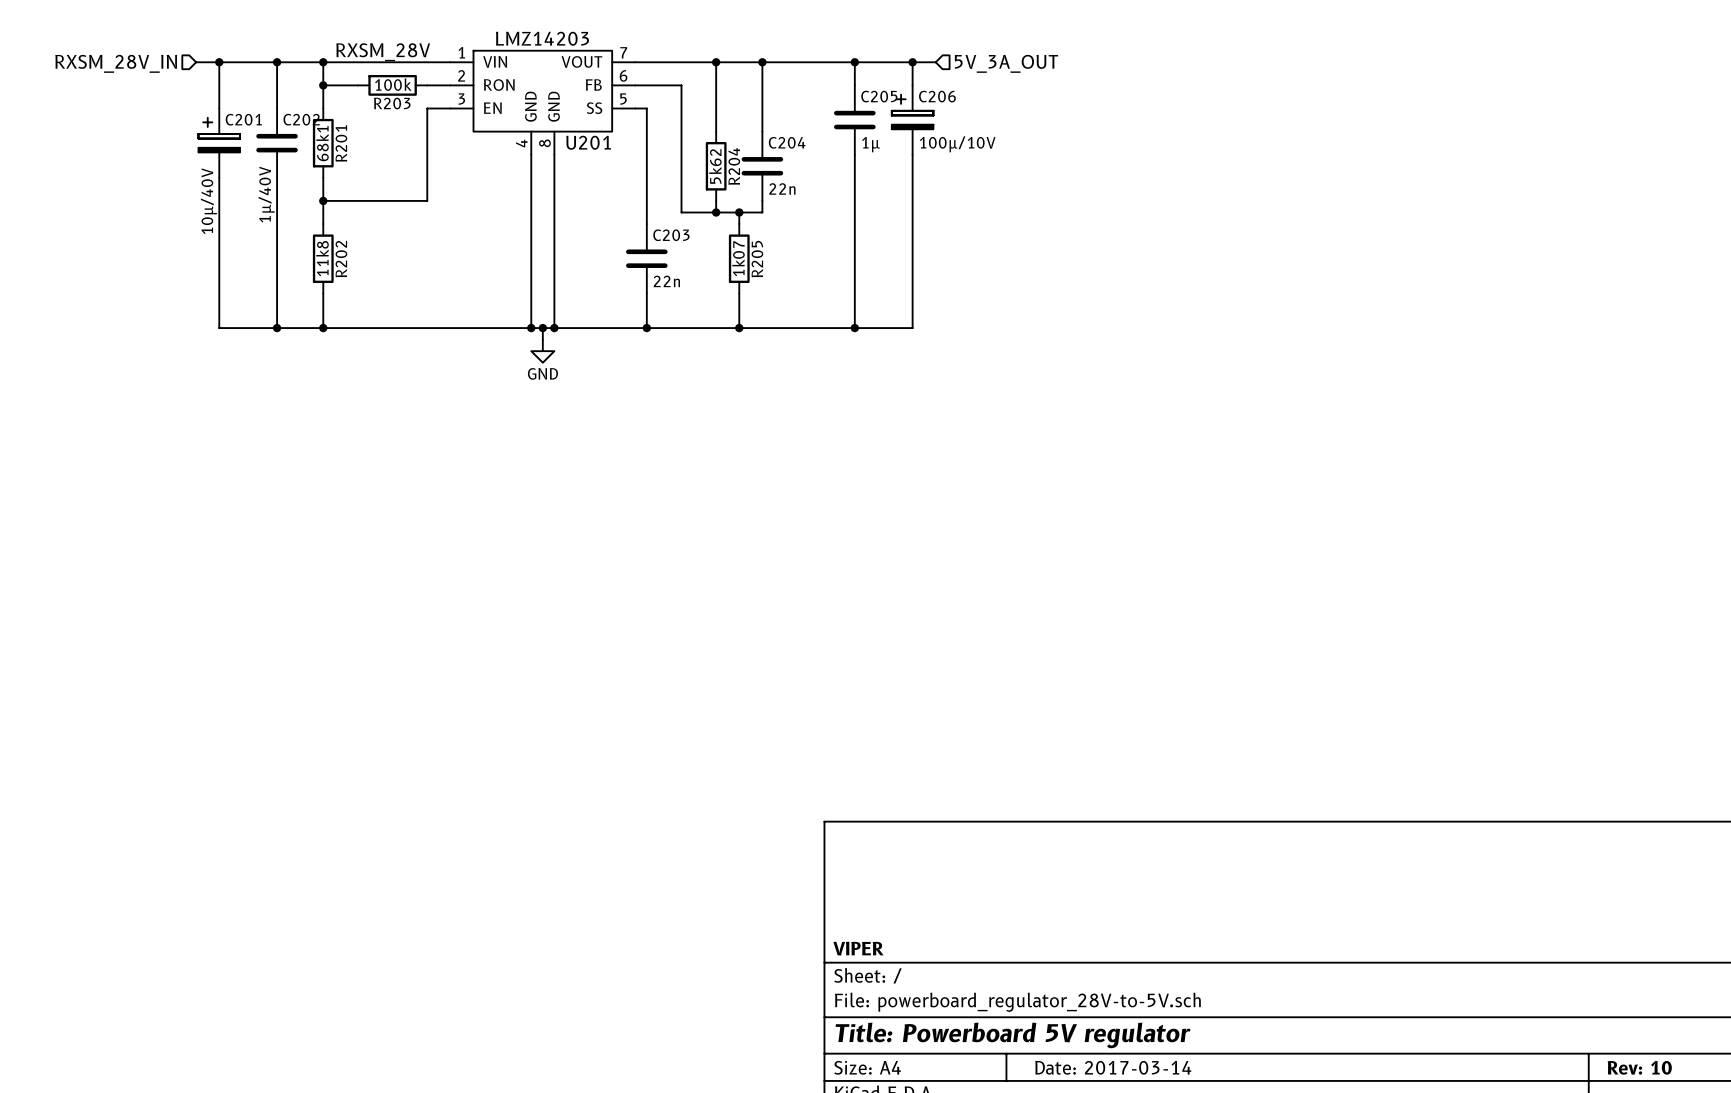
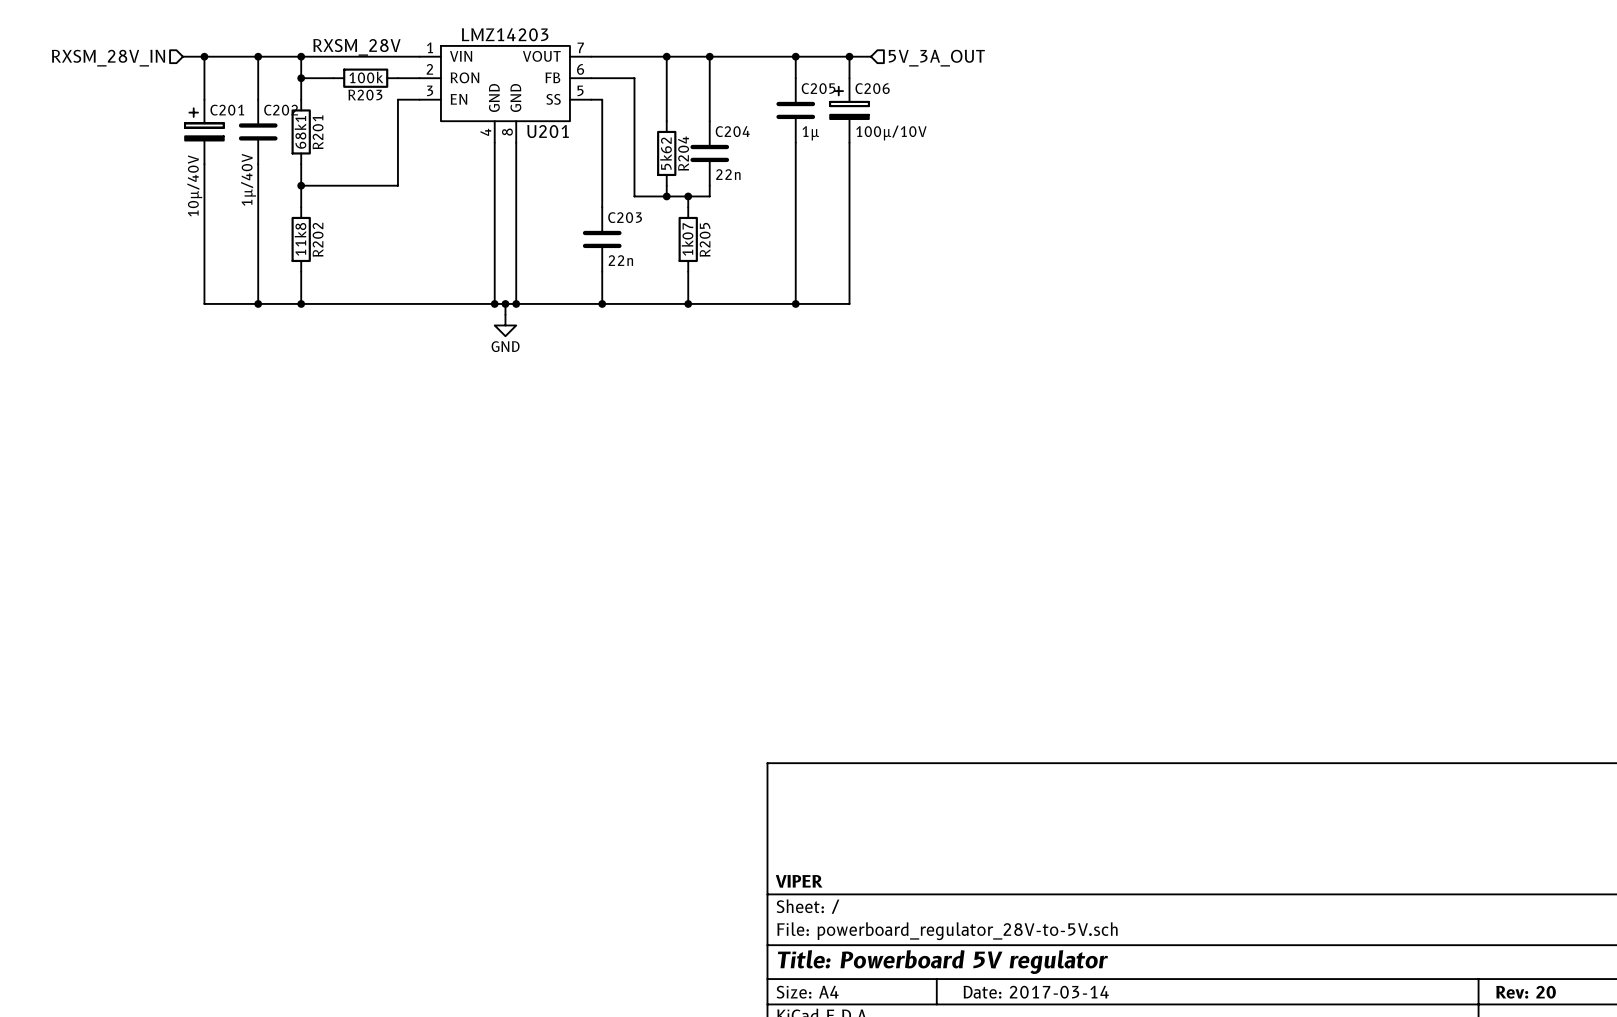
title block: Rev: 10 (1639, 1067) -> Rev: 20 (1526, 992)

